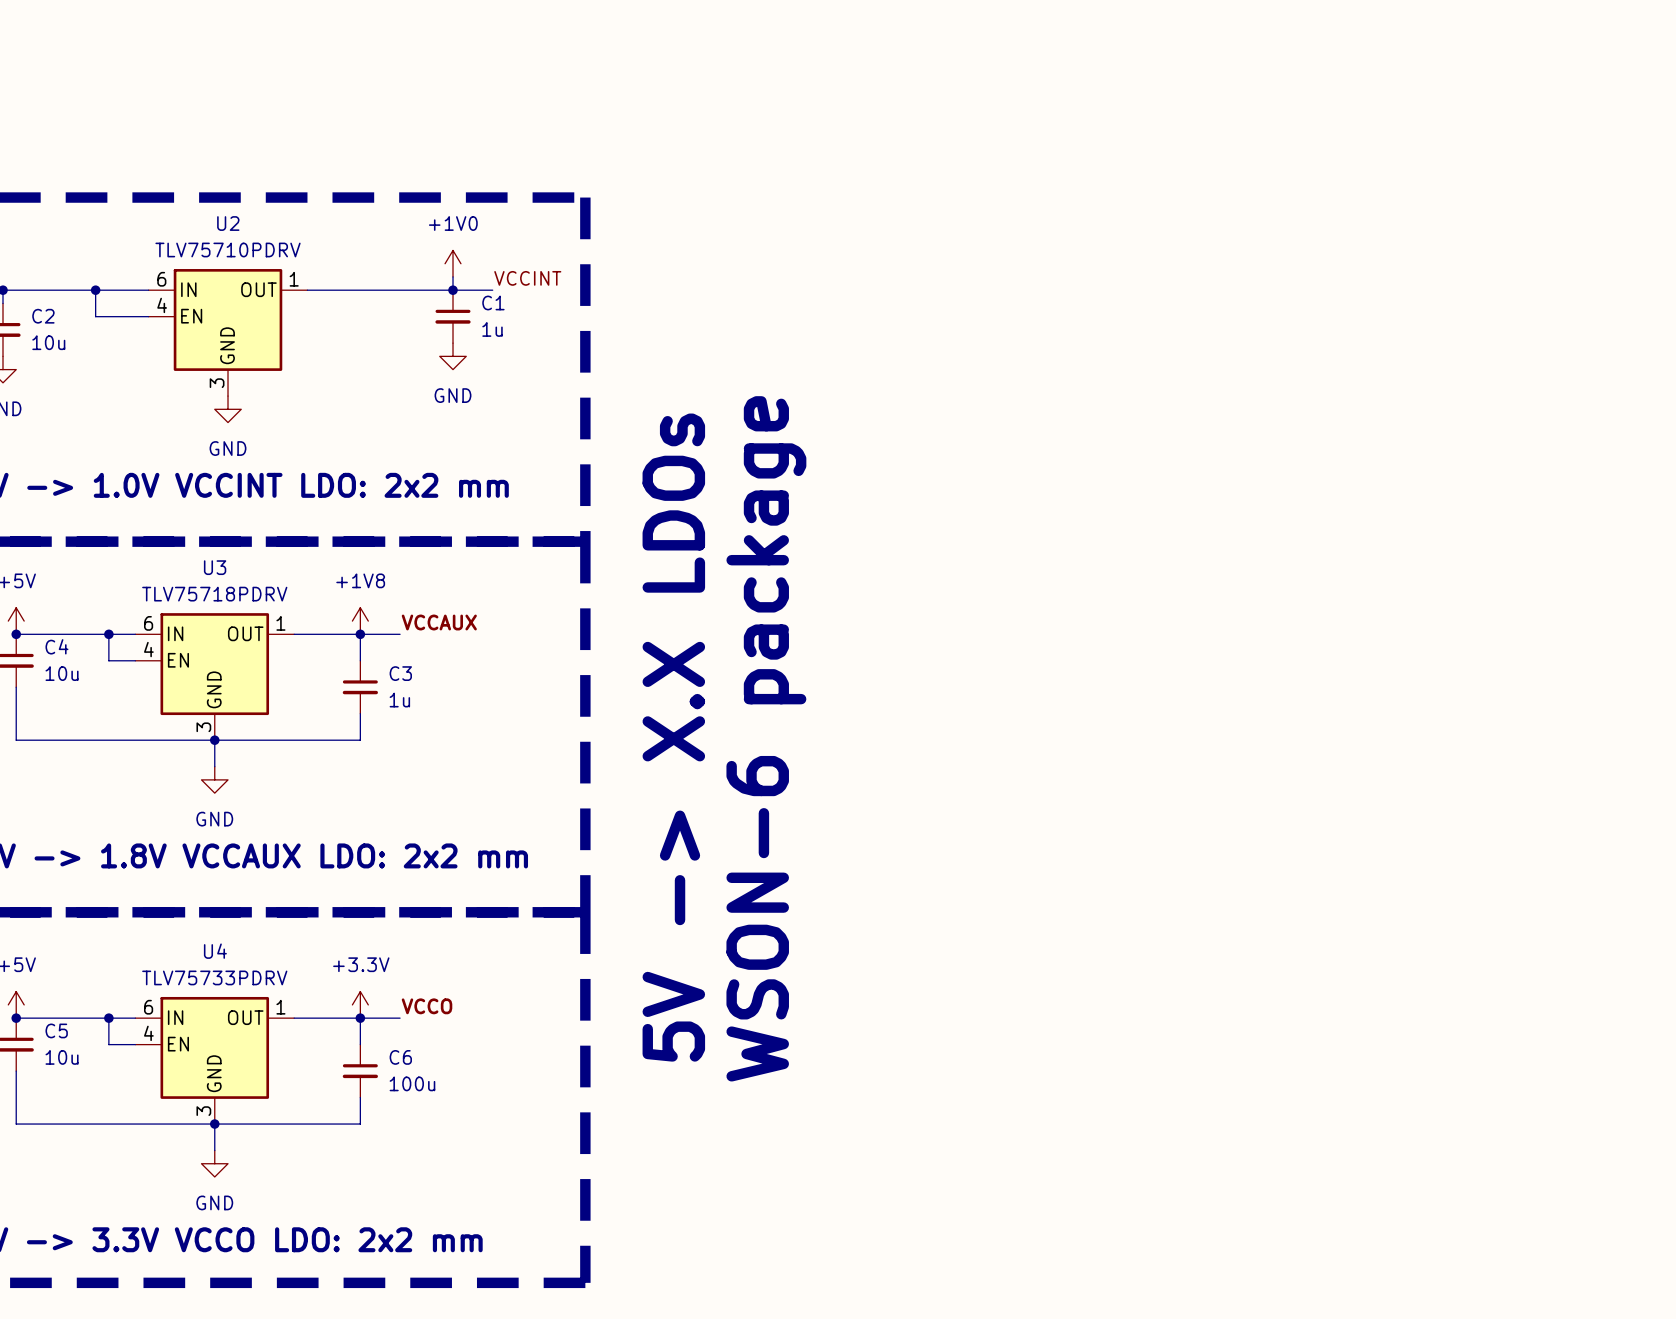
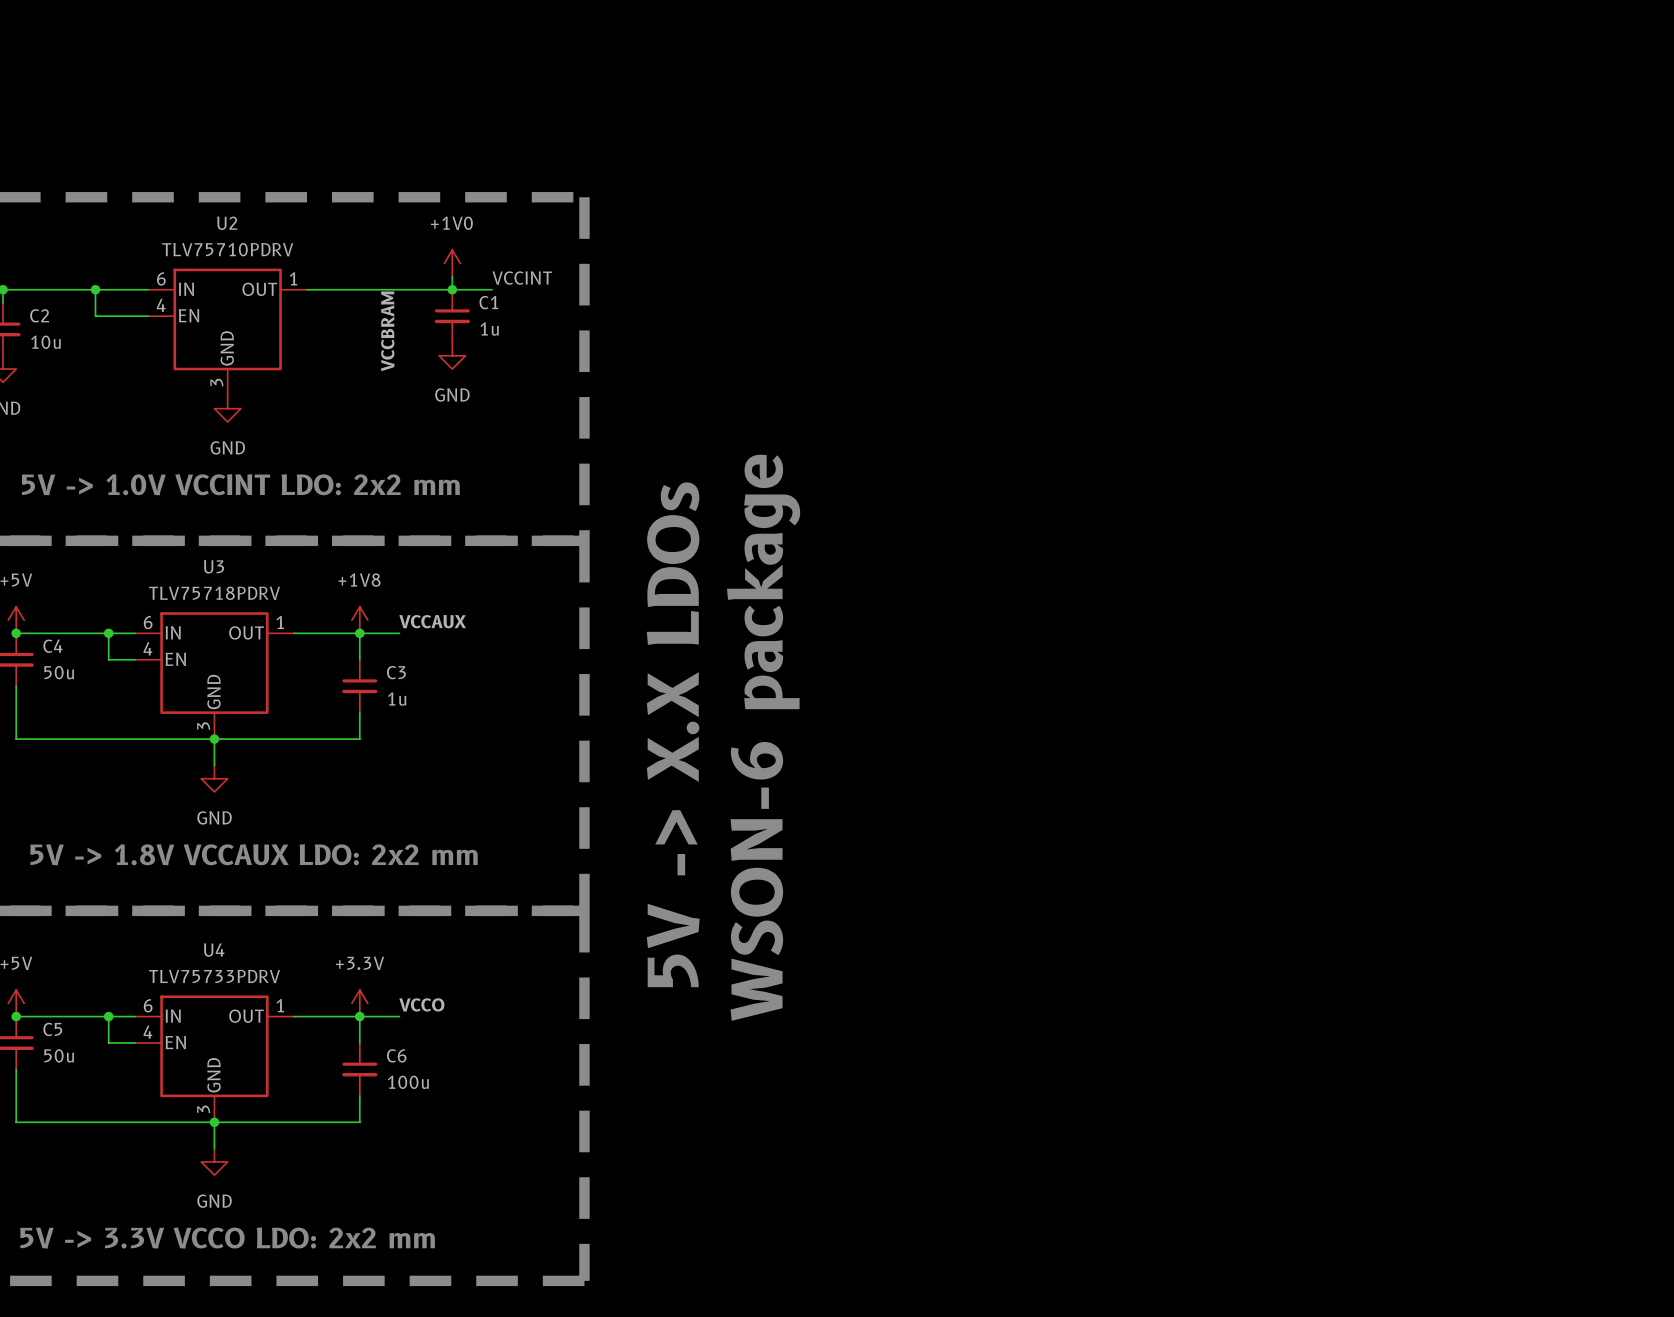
label: none -> VCCBRAM (387, 331)
C4 value: 10u (62, 673) -> 50u (59, 672)
C5 value: 10u (62, 1057) -> 50u (59, 1055)

